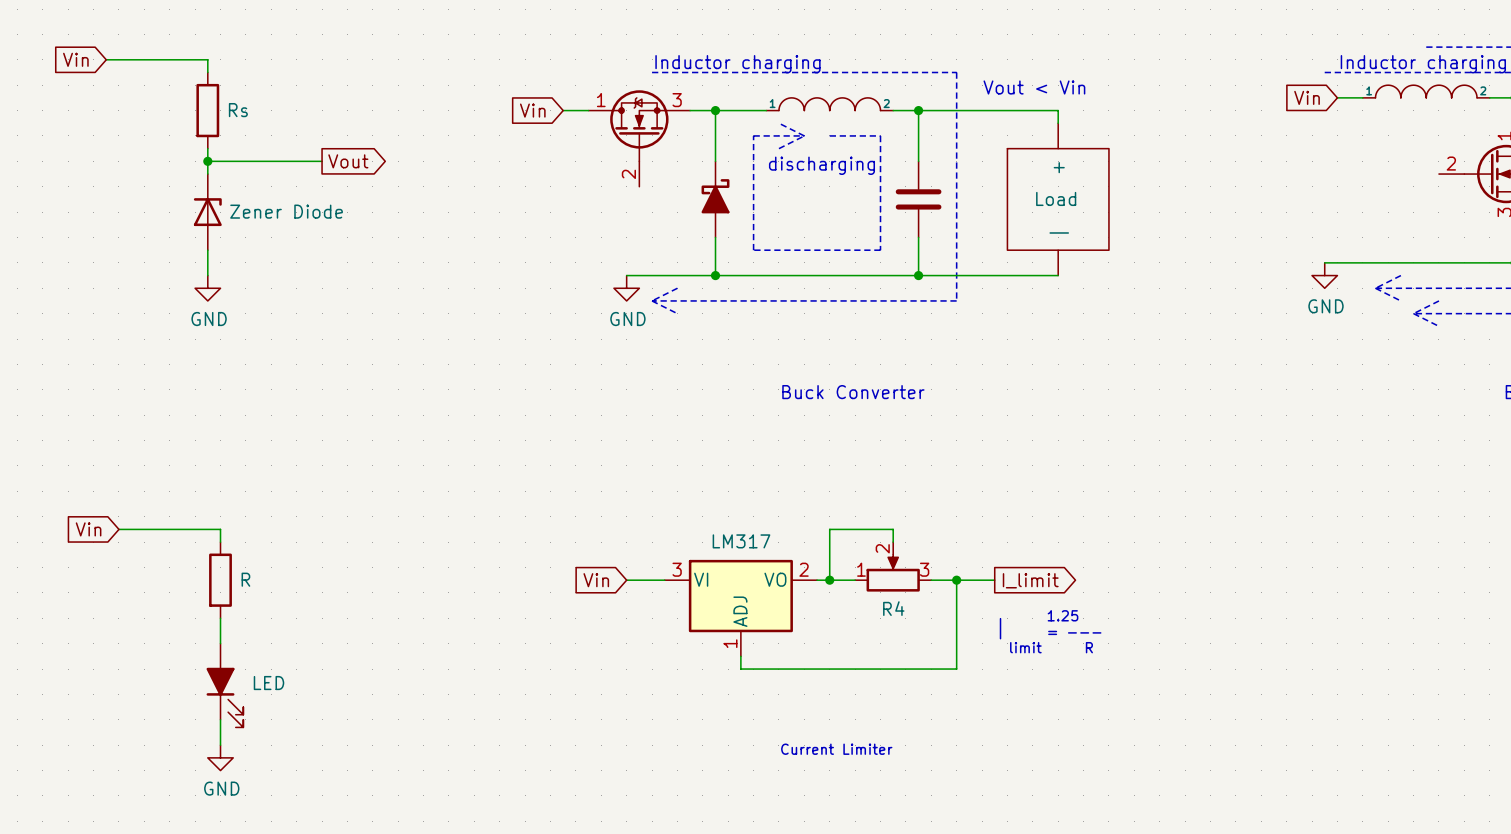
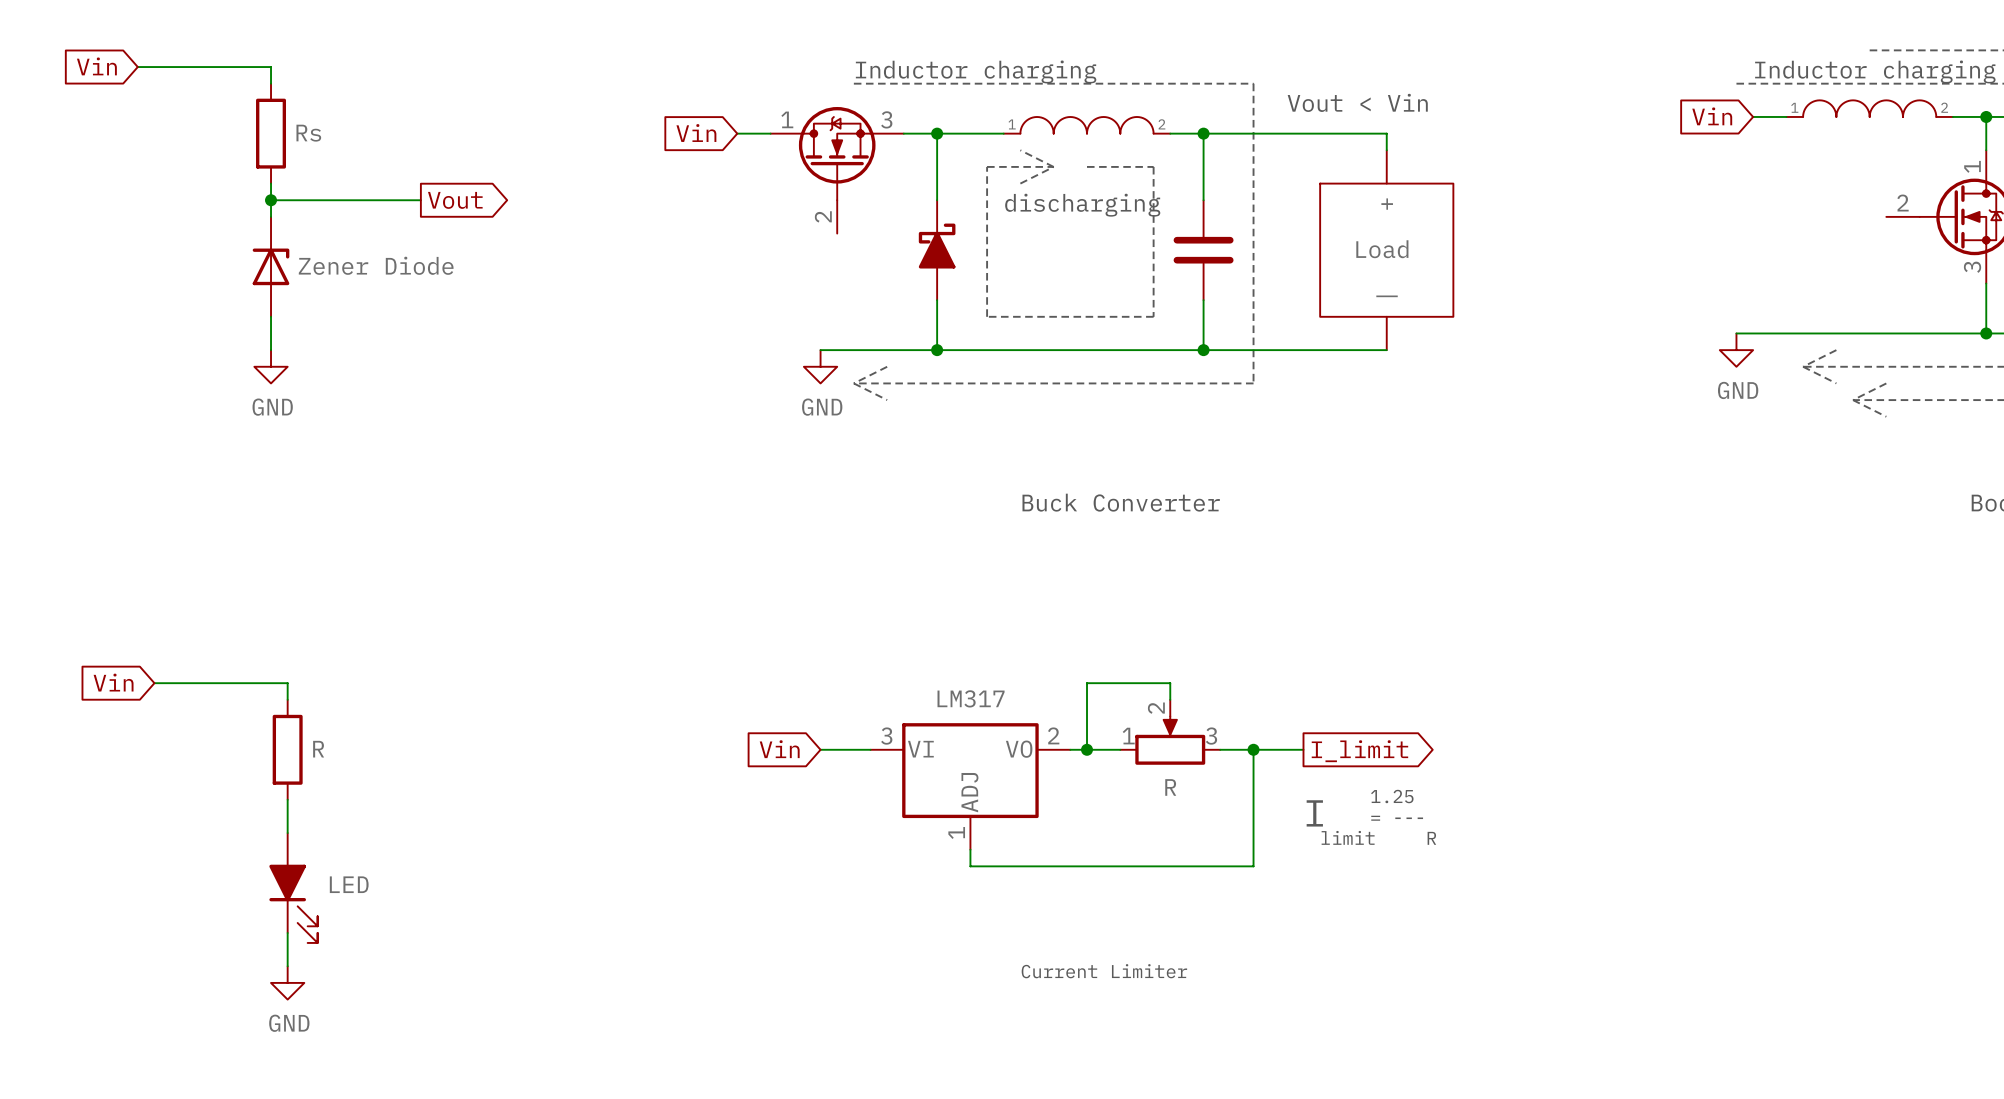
R4 name: R4 (893, 608) -> R (1170, 787)

